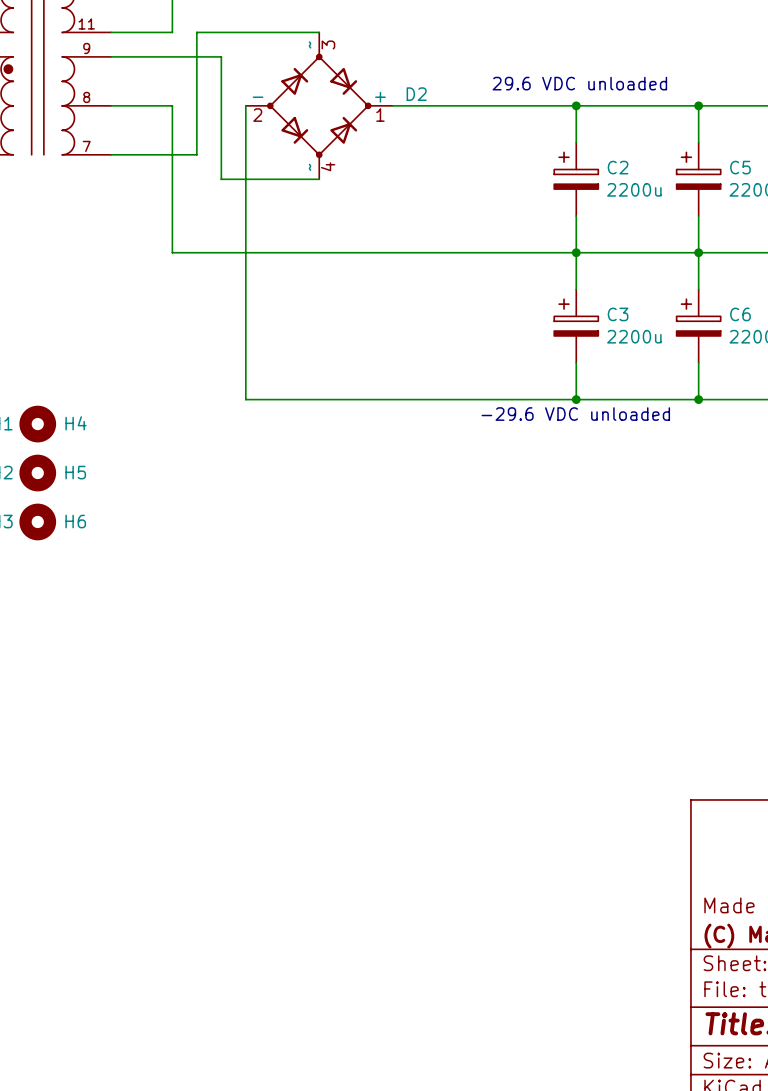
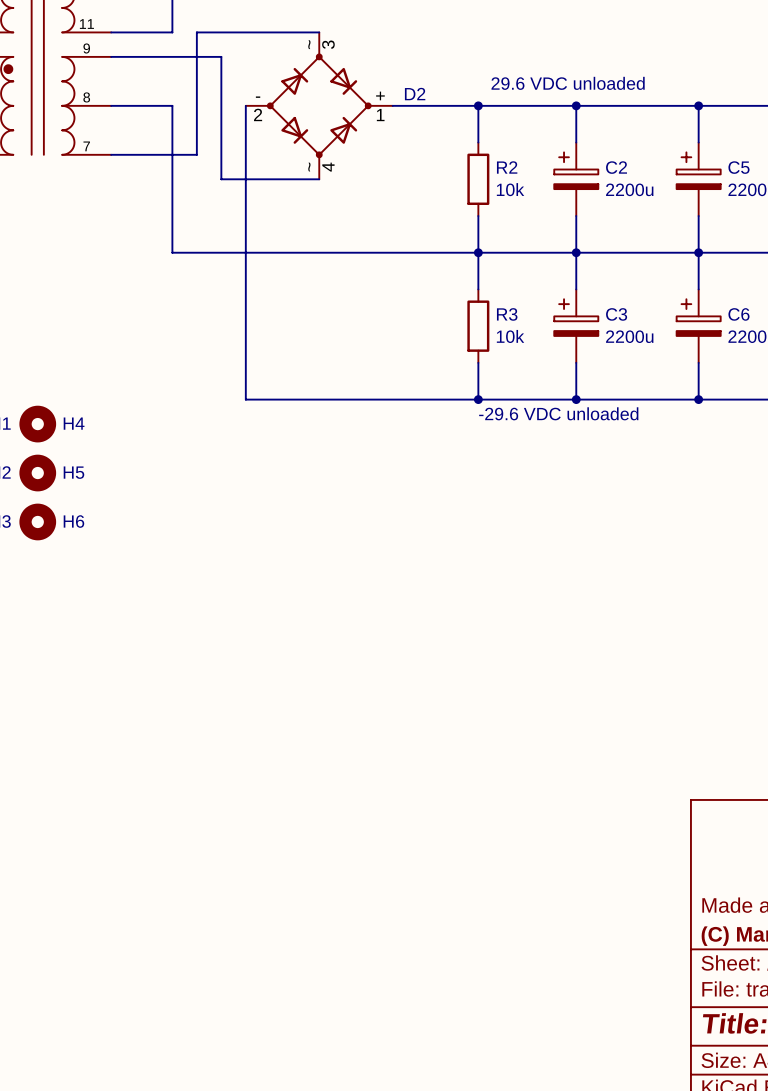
wire: none -> (478, 105) (478, 142)
junction: none -> (478, 105)
R2: none -> 10k (478, 179)
wire: none -> (478, 216) (478, 289)
junction: none -> (478, 252)
R3: none -> 10k (478, 326)
wire: none -> (478, 362) (478, 399)
junction: none -> (478, 399)

